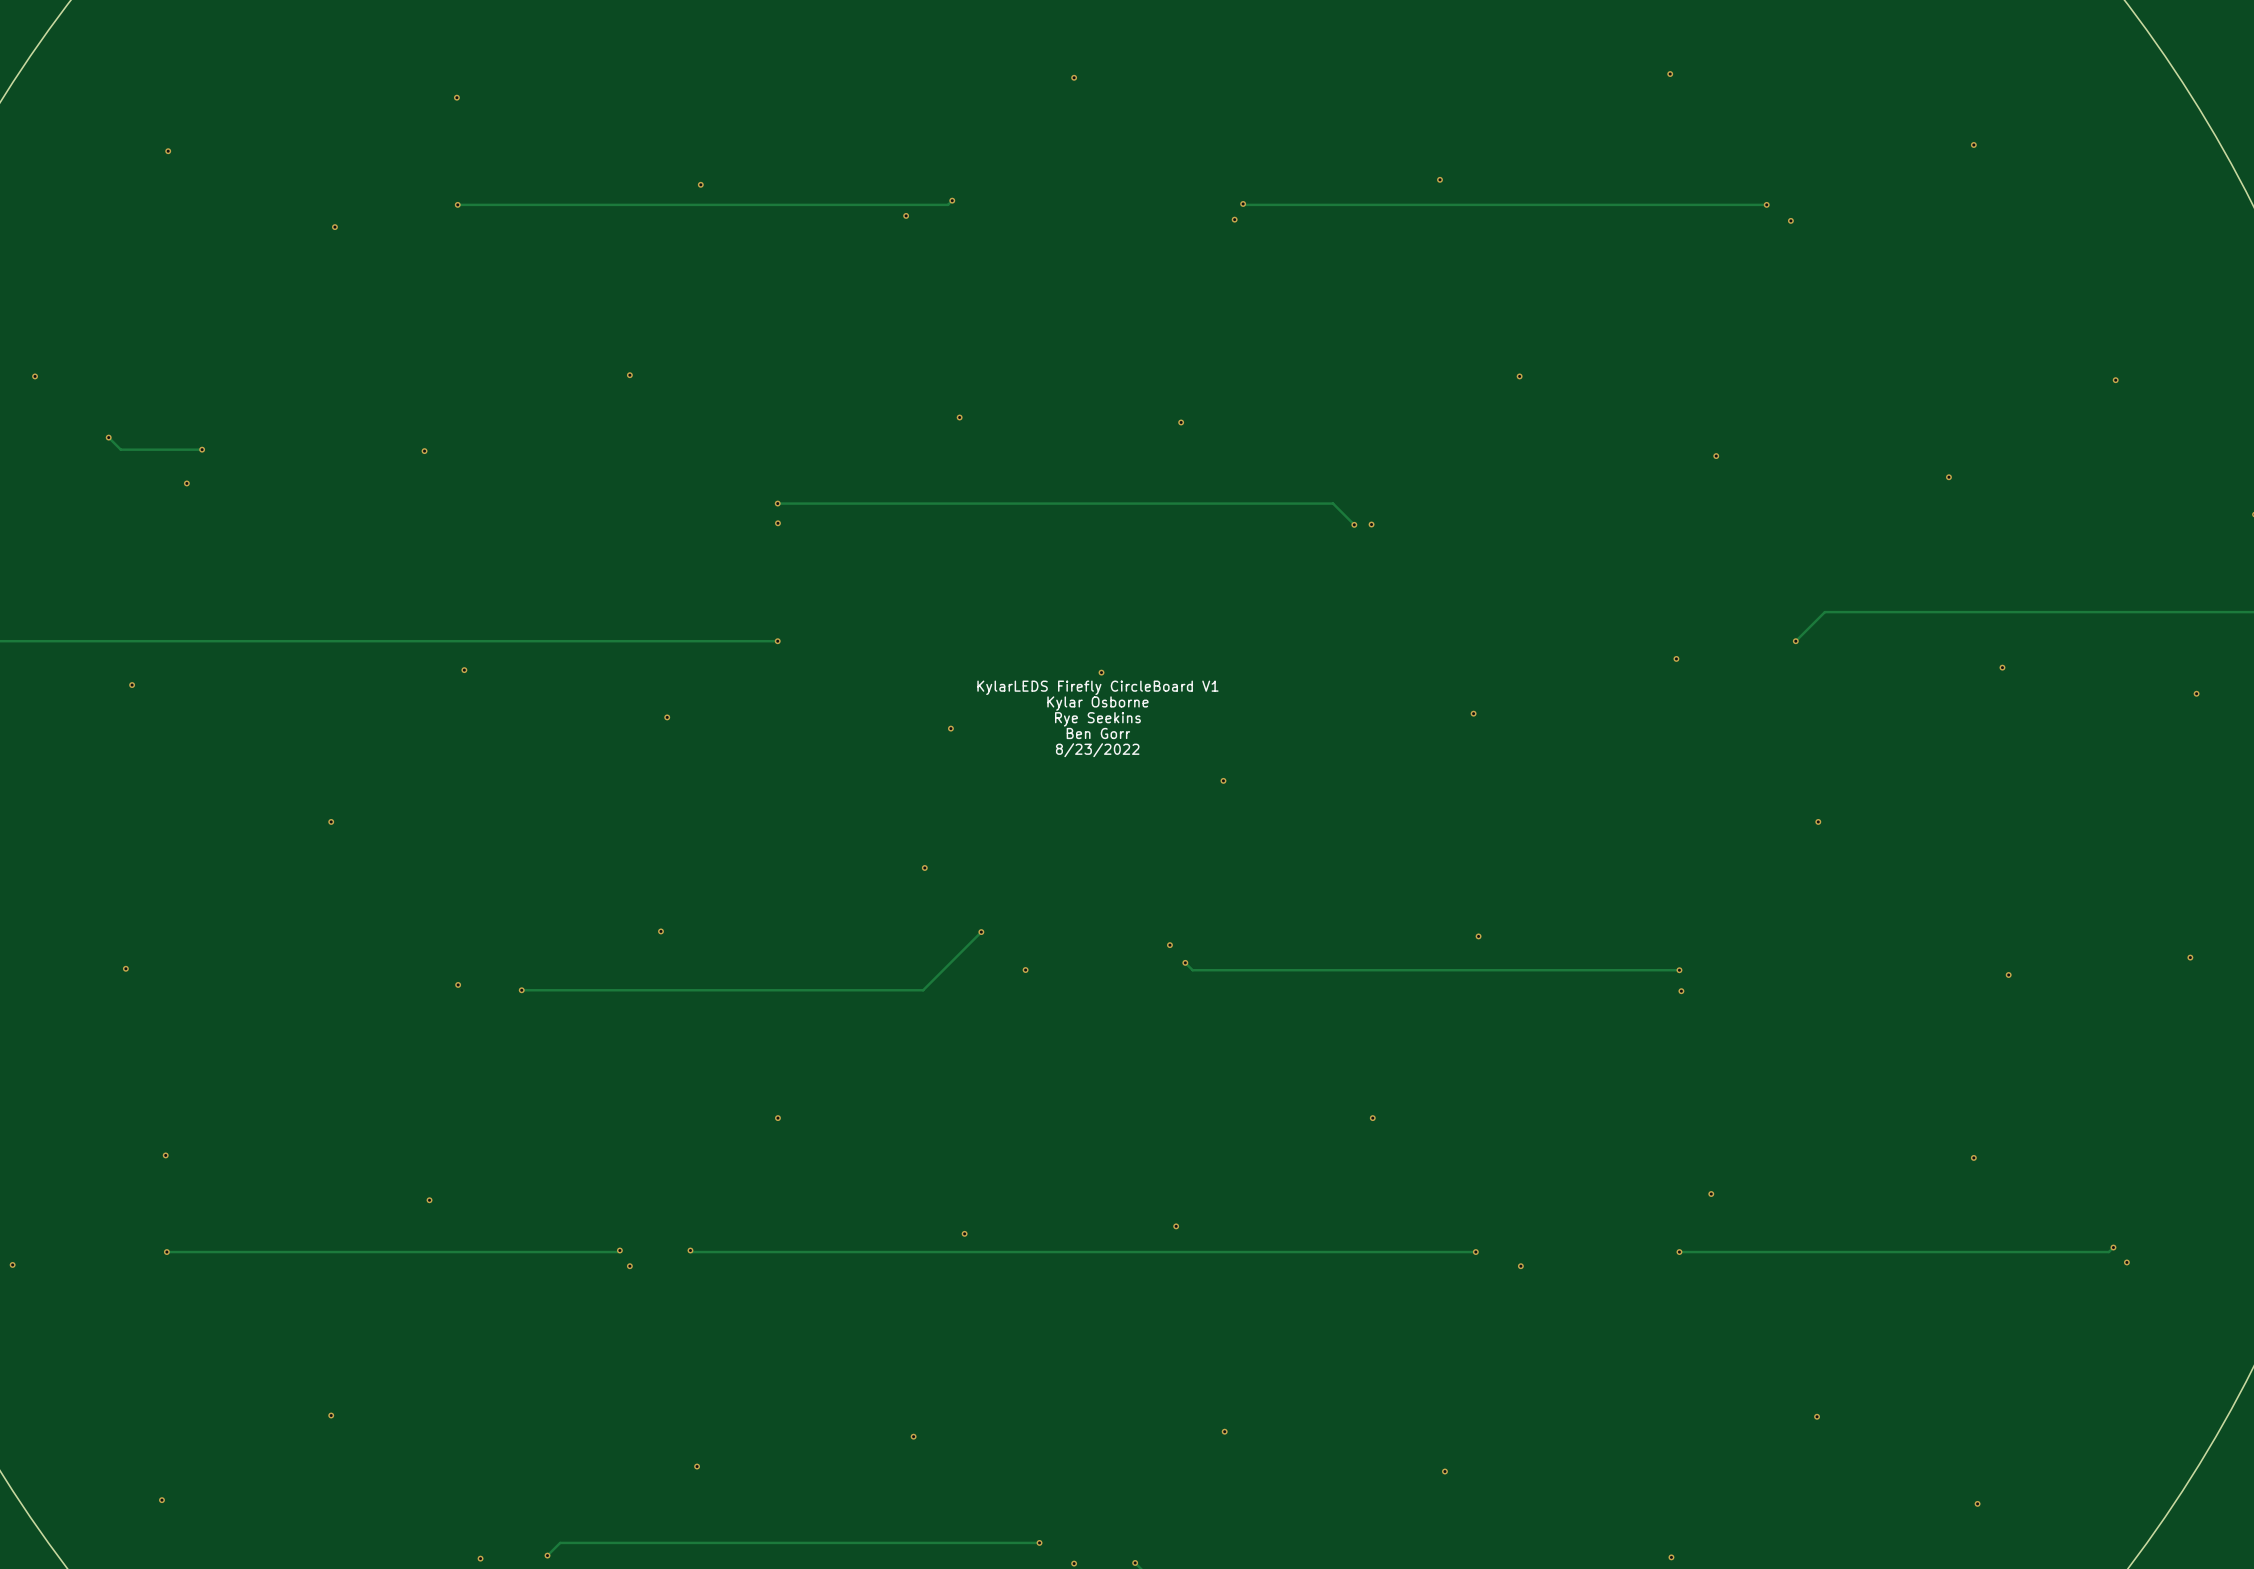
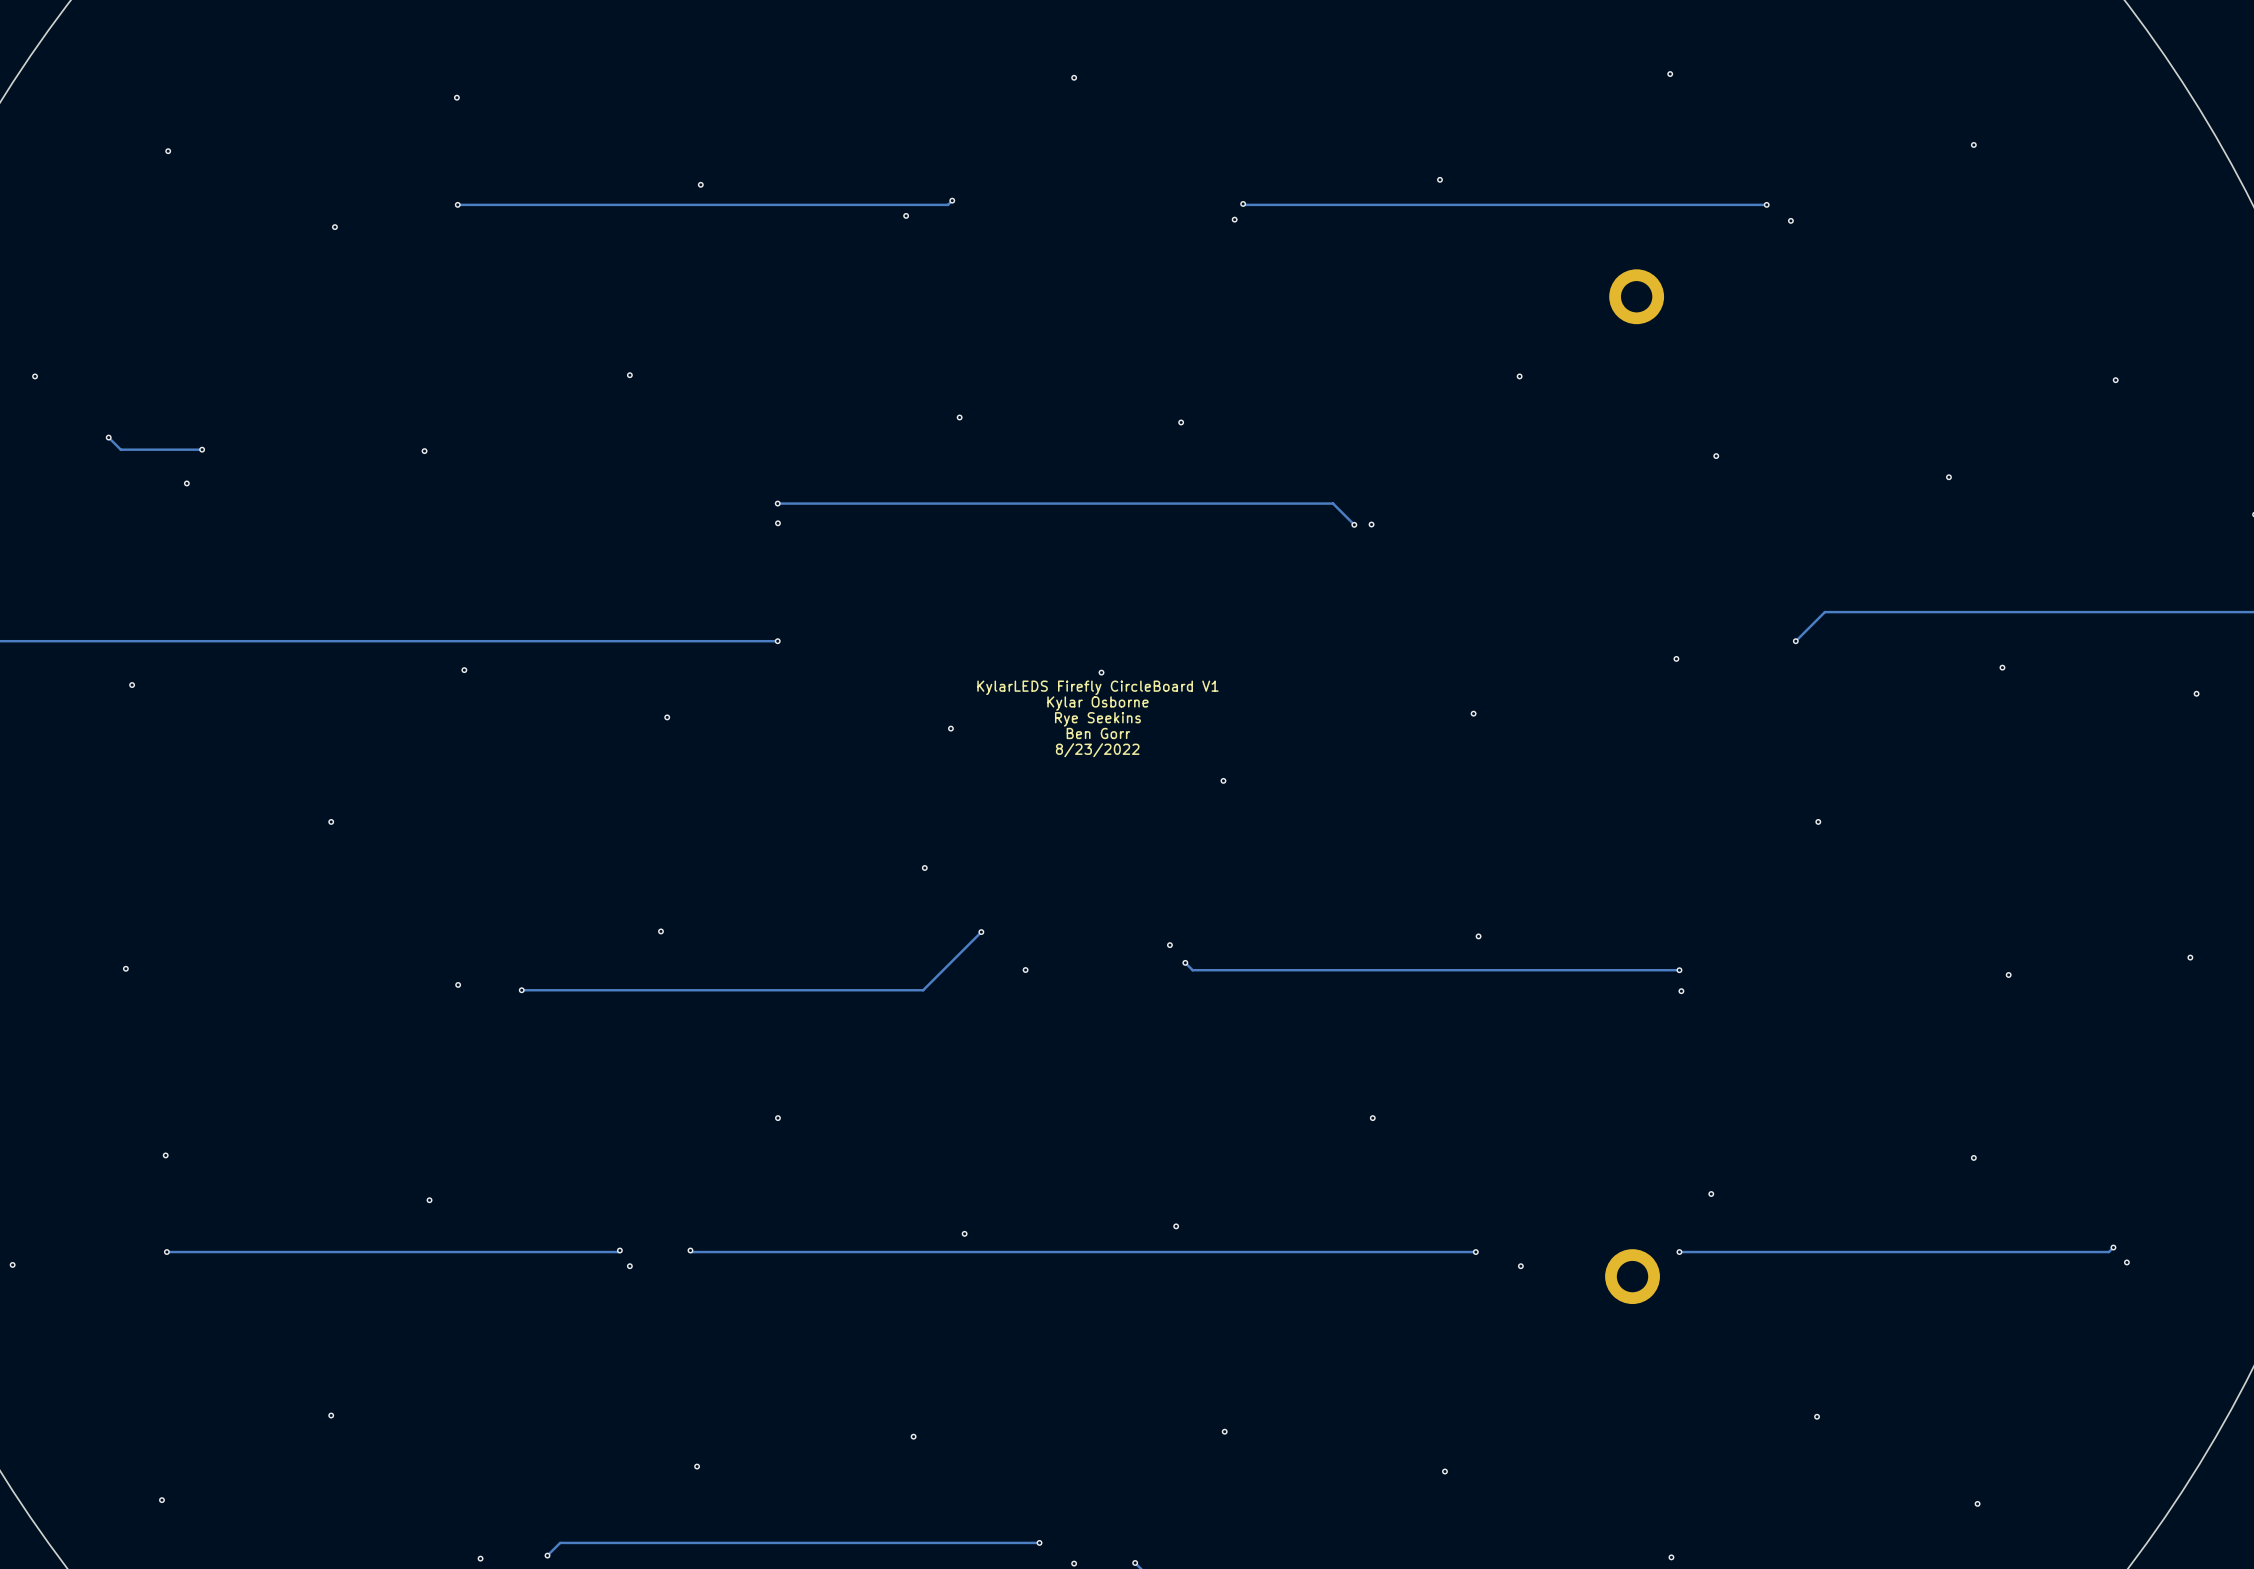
part: none -> (1636, 296)
part: none -> (1632, 1276)

